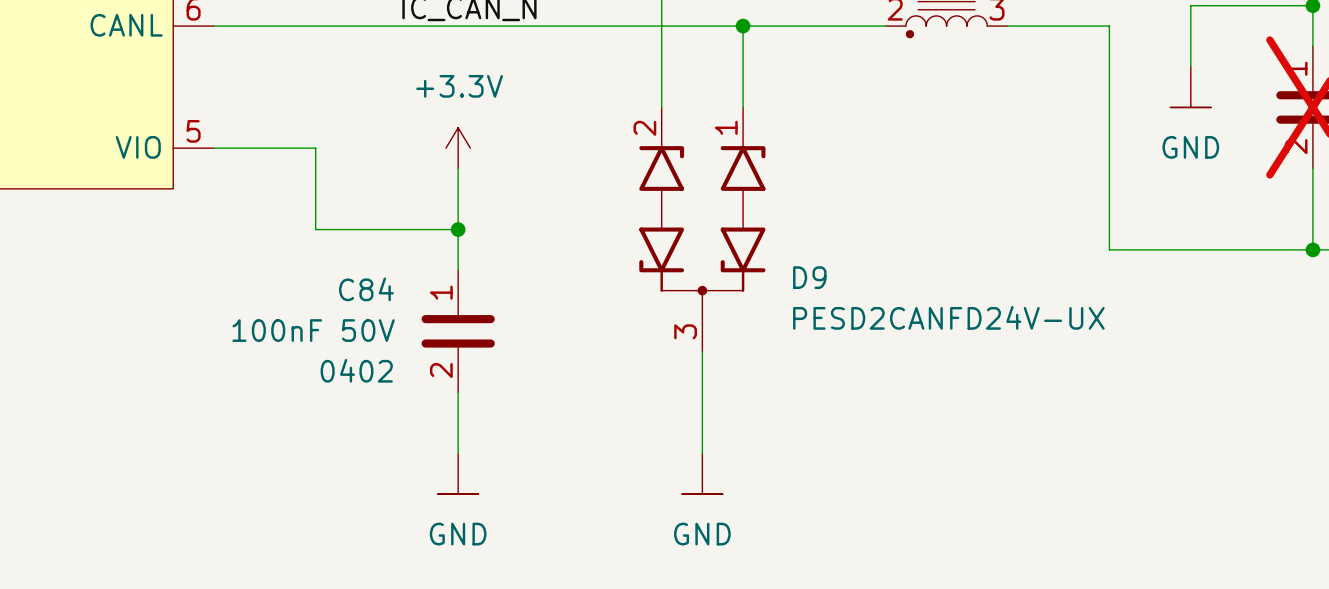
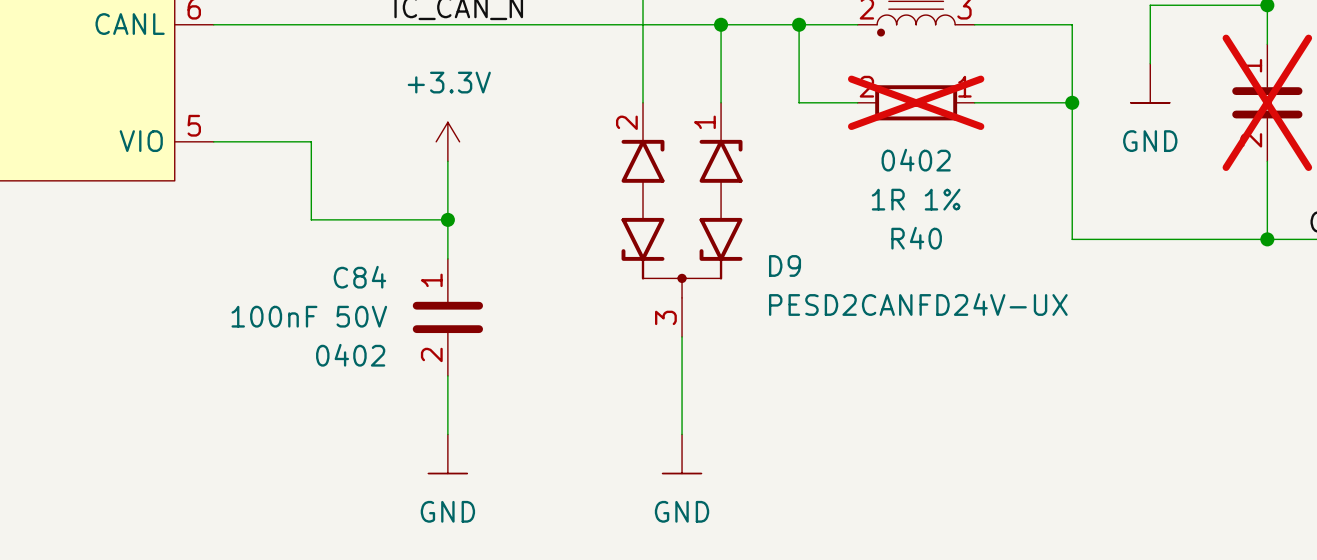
wire: none -> (799, 24) (799, 102) (857, 102)
junction: none -> (799, 24)
R40: none -> 1R 1% (916, 102)
wire: none -> (974, 102) (1072, 102)
junction: none -> (1072, 102)

